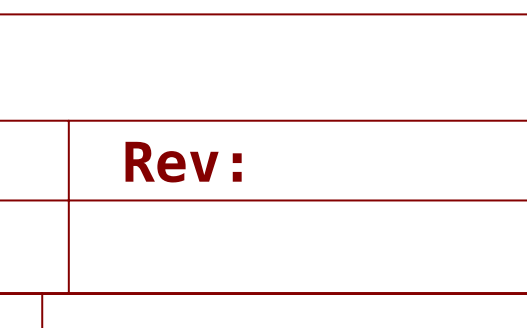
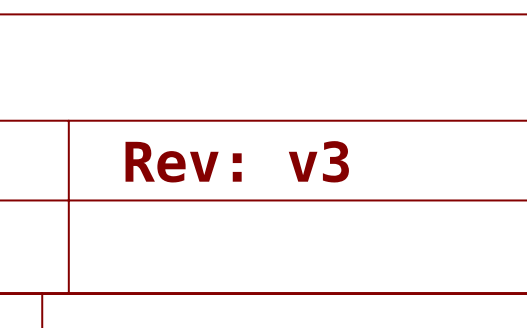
title block: Rev: (183, 162) -> Rev: v3 (237, 161)

